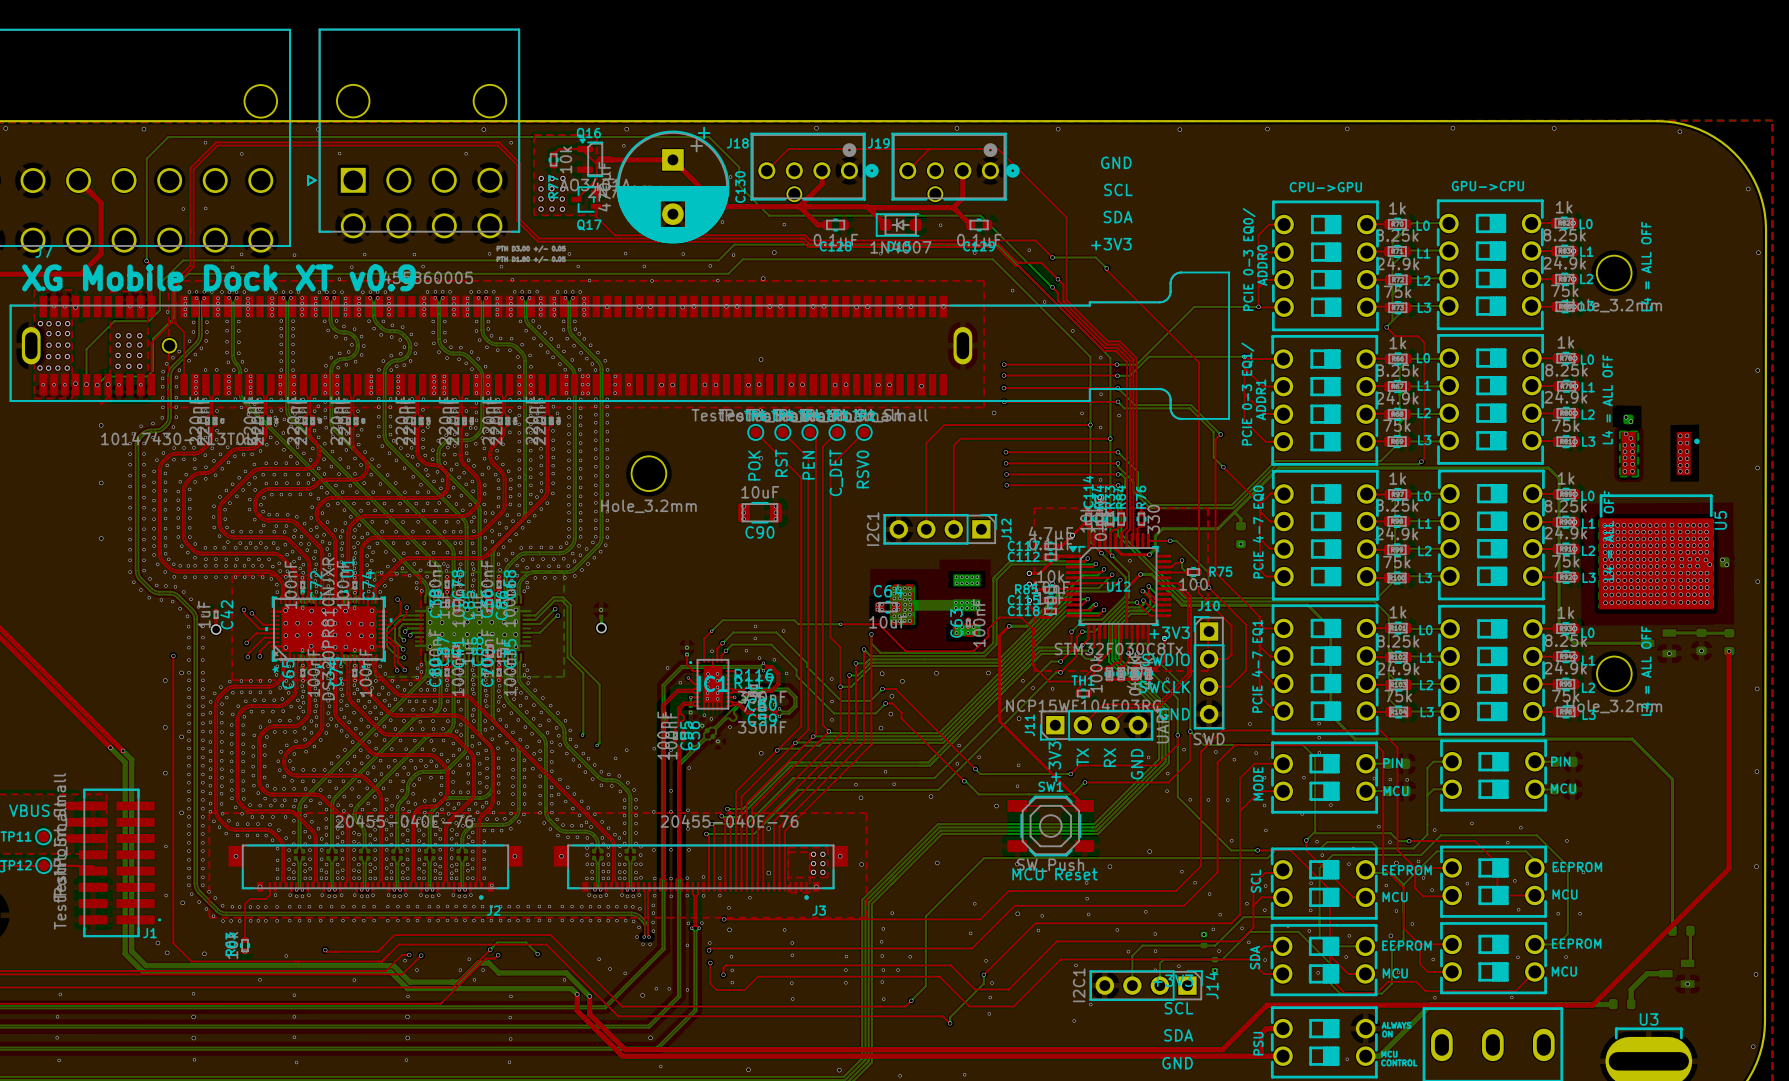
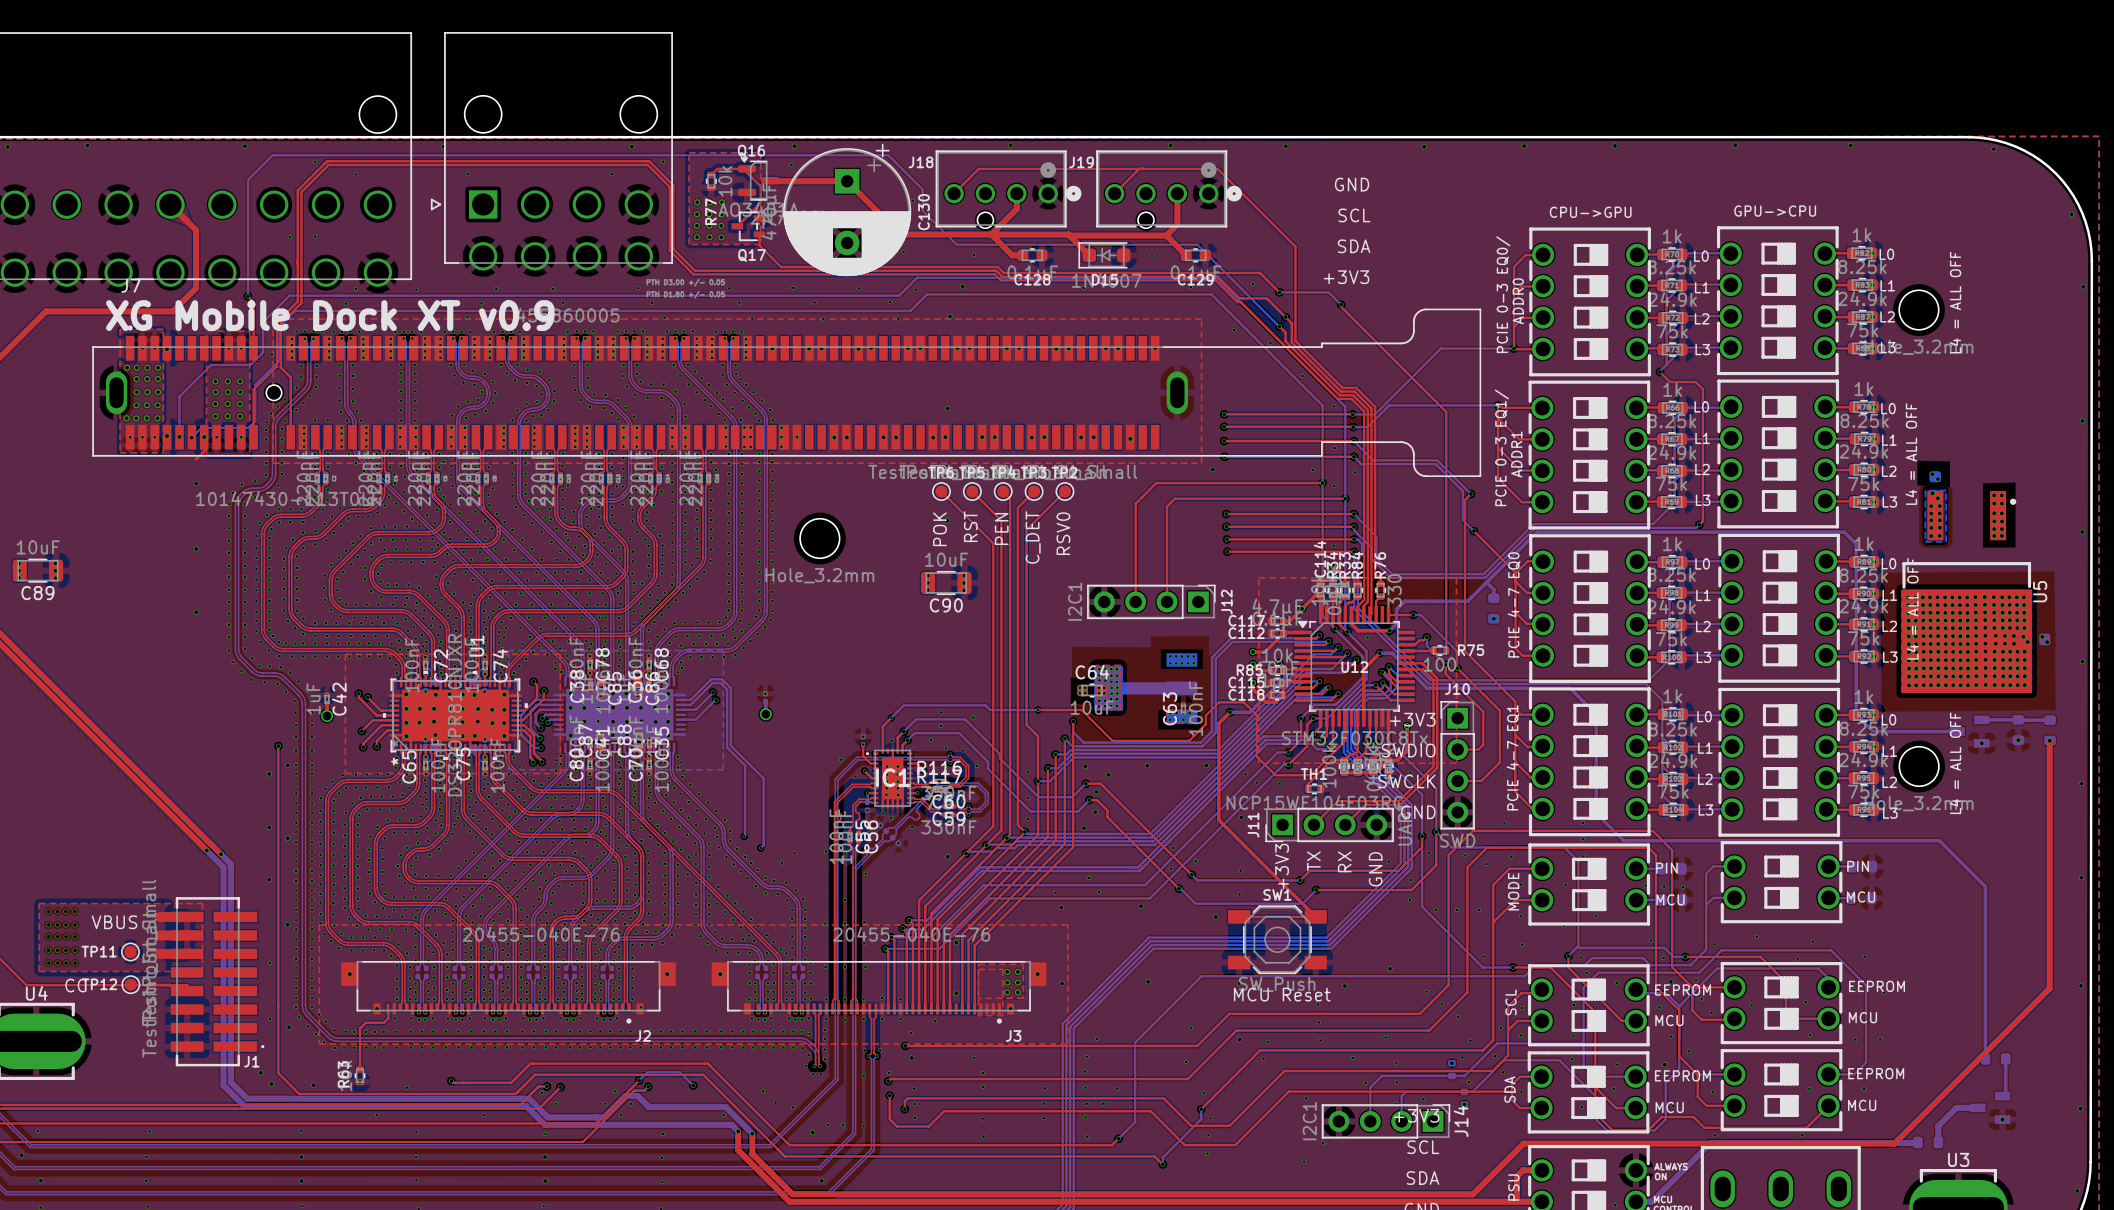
via: (955, 602) -> none
via: (961, 602) -> none
via: (967, 602) -> none
via: (972, 602) -> none
via: (977, 602) -> none
via: (955, 607) -> none
via: (961, 608) -> none
via: (967, 608) -> none
via: (972, 608) -> none
via: (977, 608) -> none

